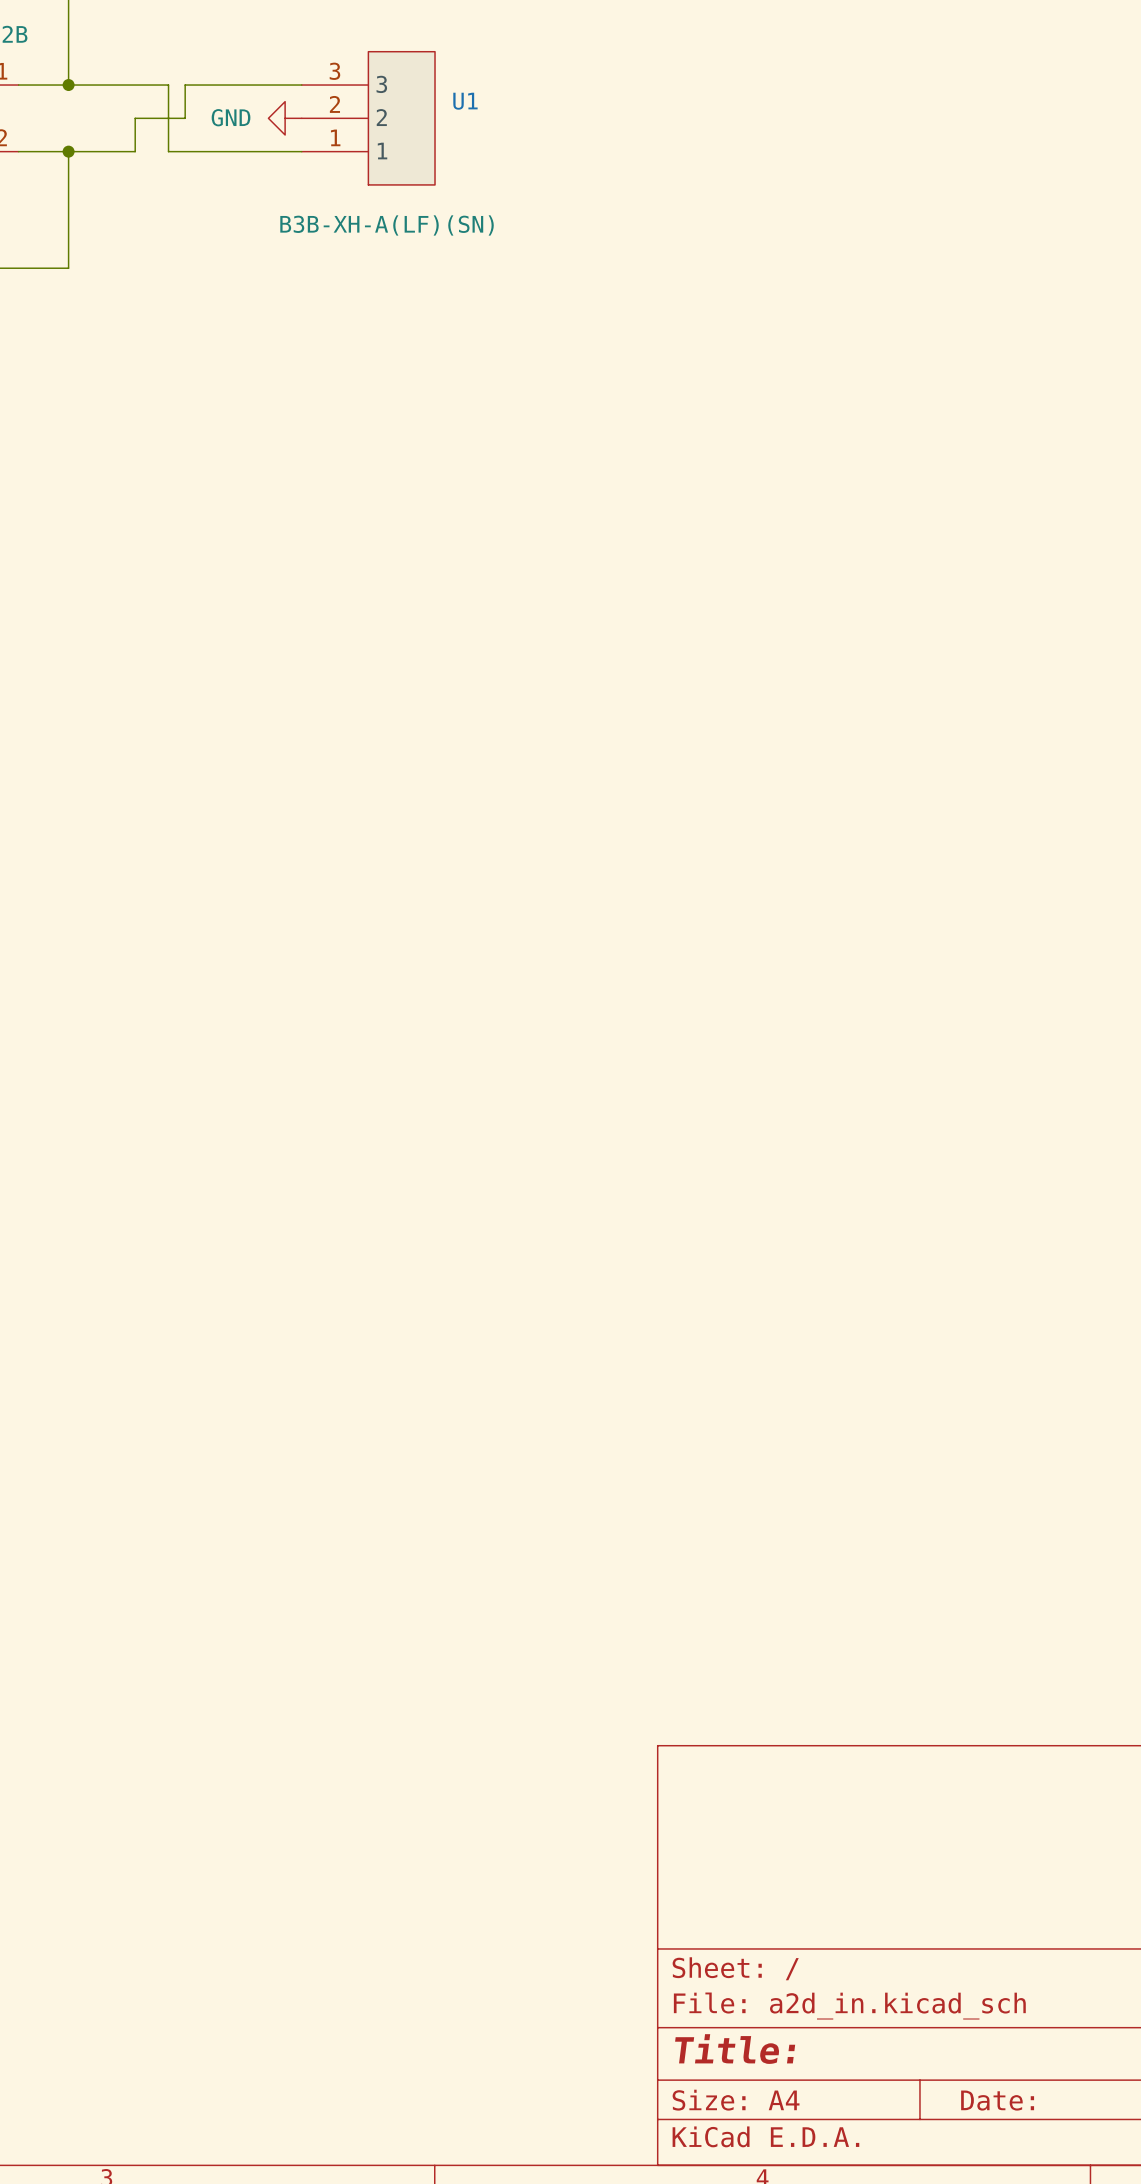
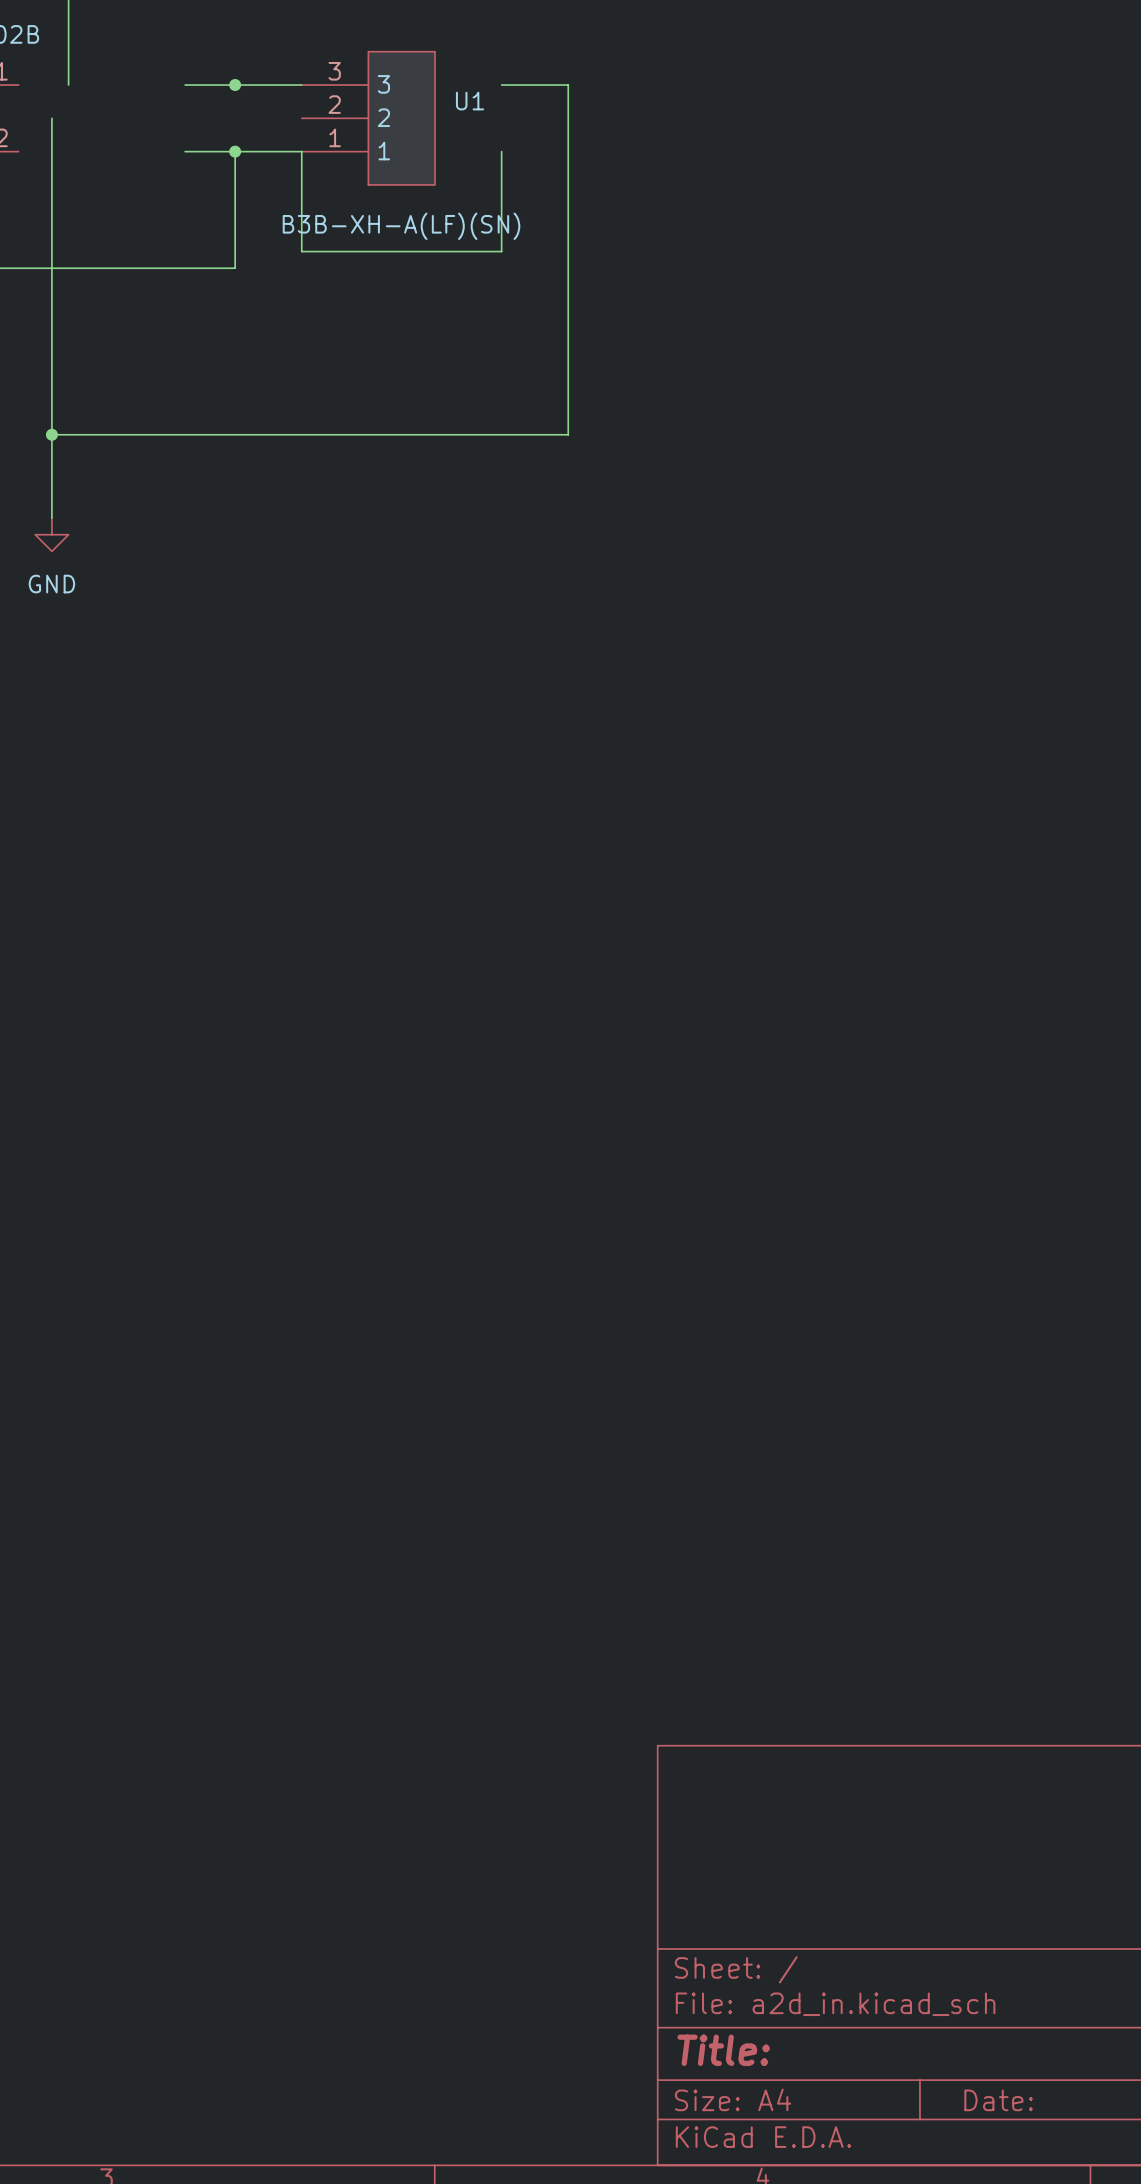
wire: (18, 85) (168, 85) (168, 151) (185, 151) -> none
junction: (68, 85) -> none
wire: (185, 85) (185, 118) (135, 118) (135, 151) (18, 151) -> none
junction: none -> (235, 85)
wire: none -> (501, 85) (568, 85) (568, 434) (51, 434)
wire: none -> (51, 118) (51, 518)
power symbol: GND (285, 118) -> none
wire: (68, 151) (68, 268) -> (235, 151) (235, 268) (68, 268)
junction: (68, 151) -> none
junction: none -> (235, 151)
wire: none -> (301, 151) (301, 251) (501, 251) (501, 151)
junction: none -> (51, 434)
power symbol: none -> GND (51, 534)

